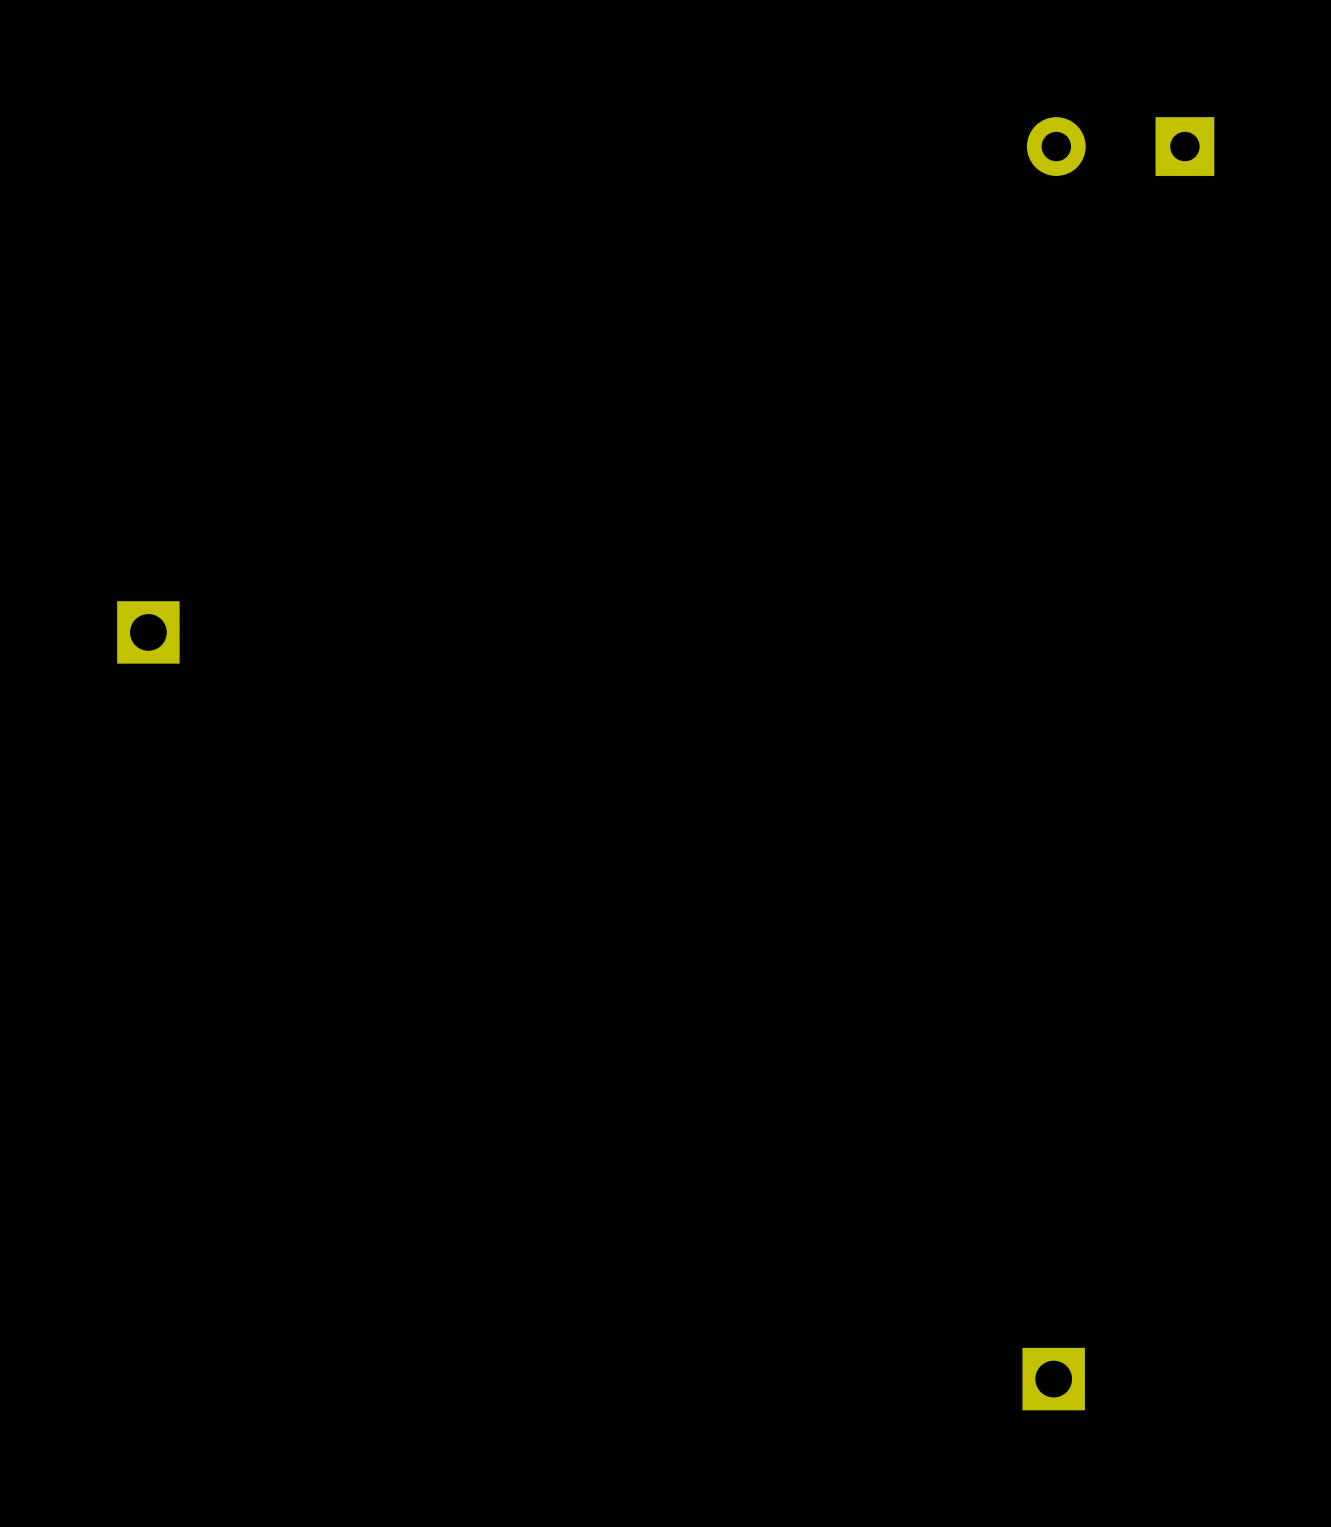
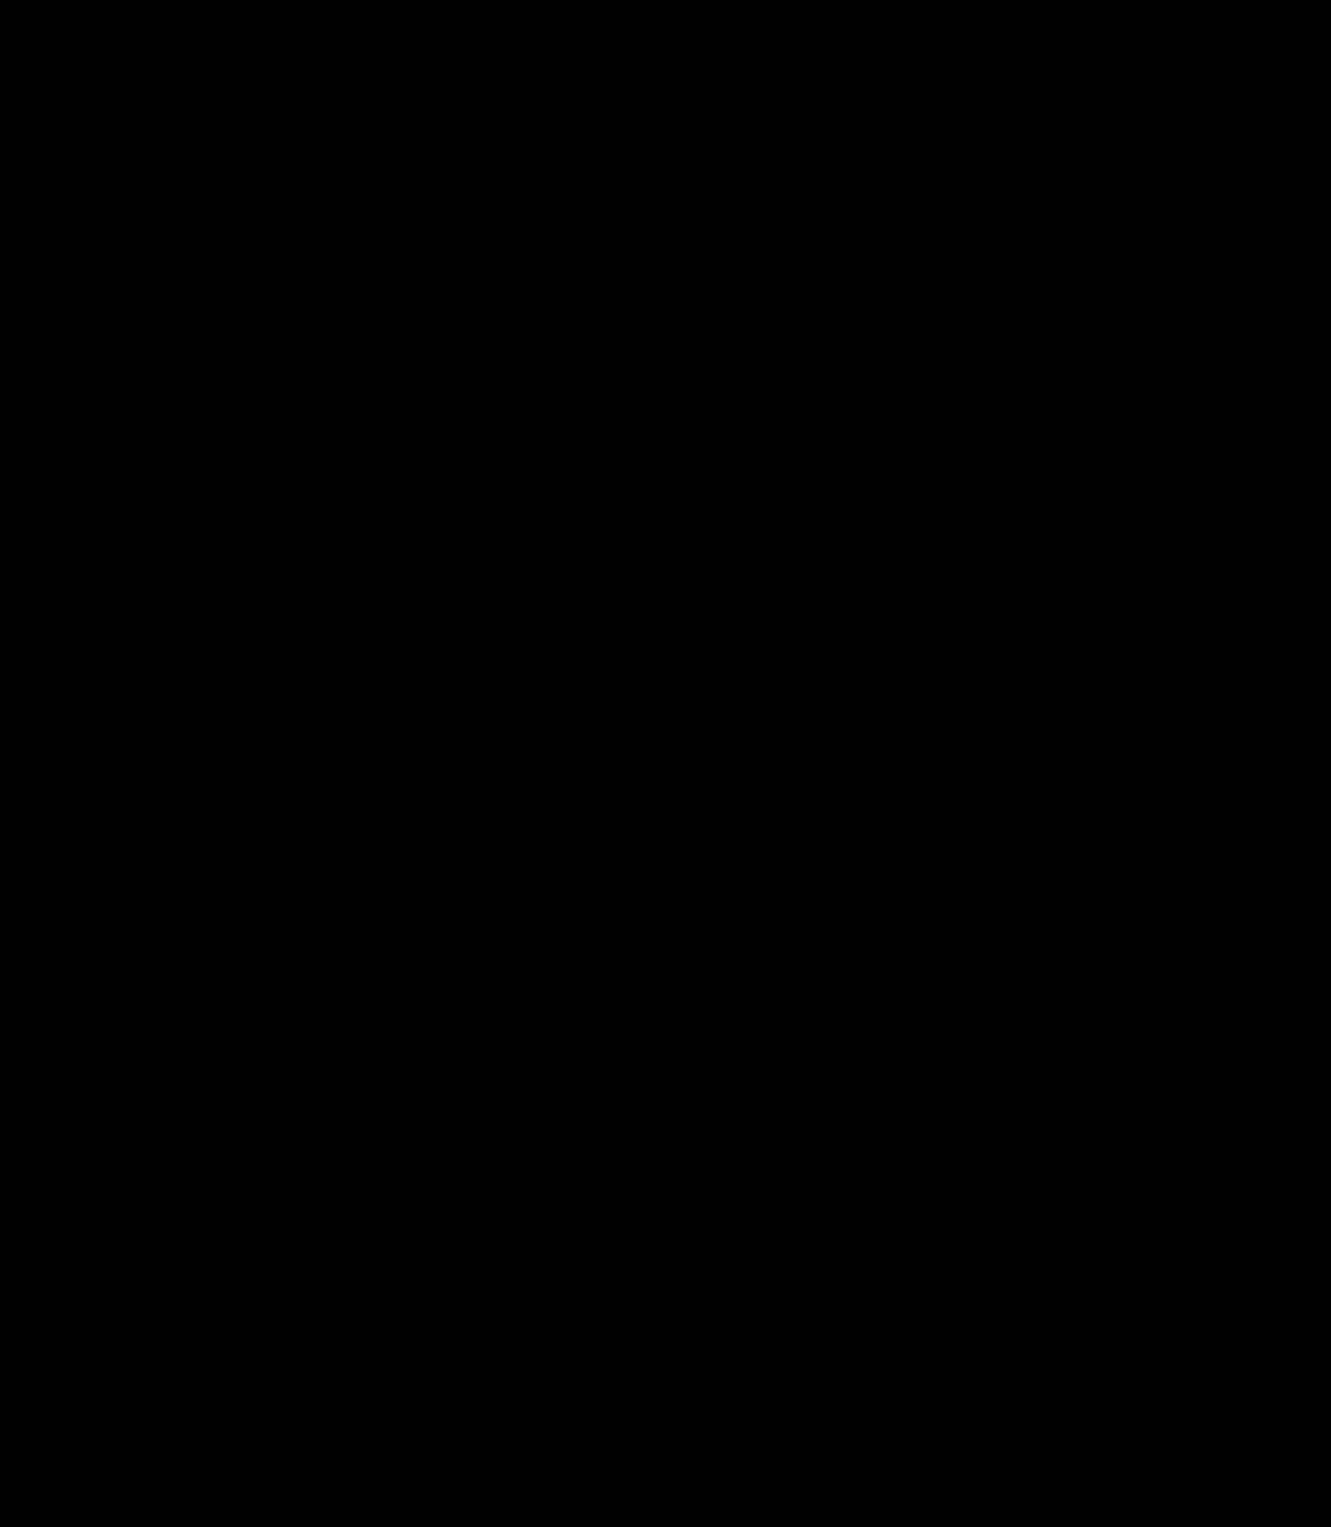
part: (1120, 146) -> none
part: (148, 632) -> none
part: (1053, 1379) -> none

